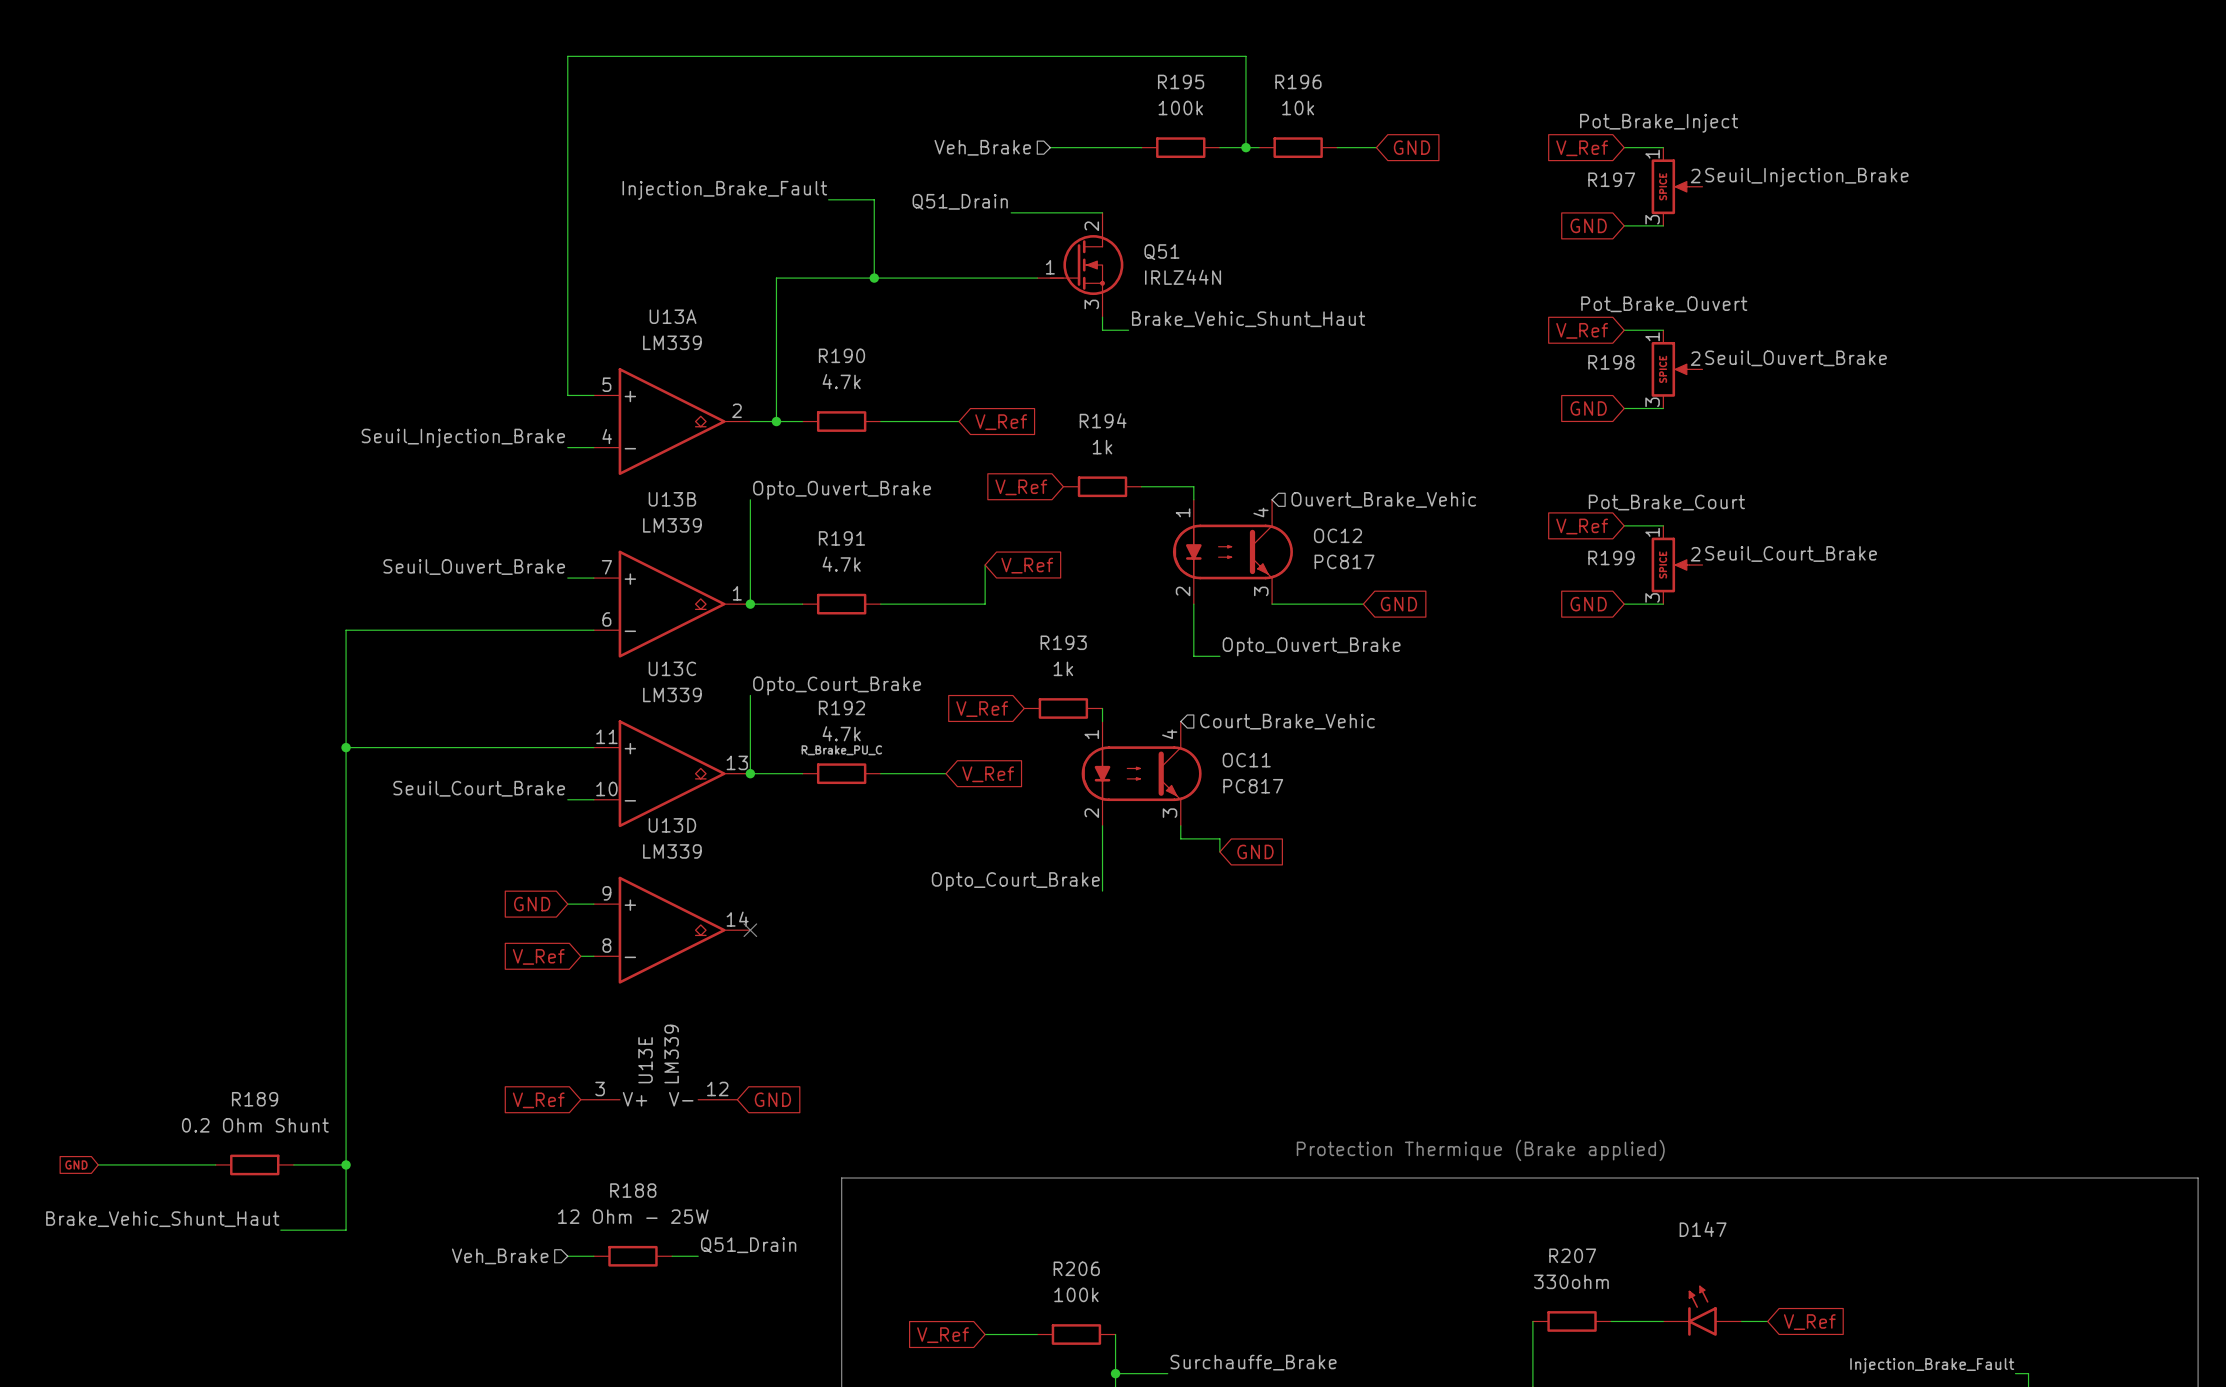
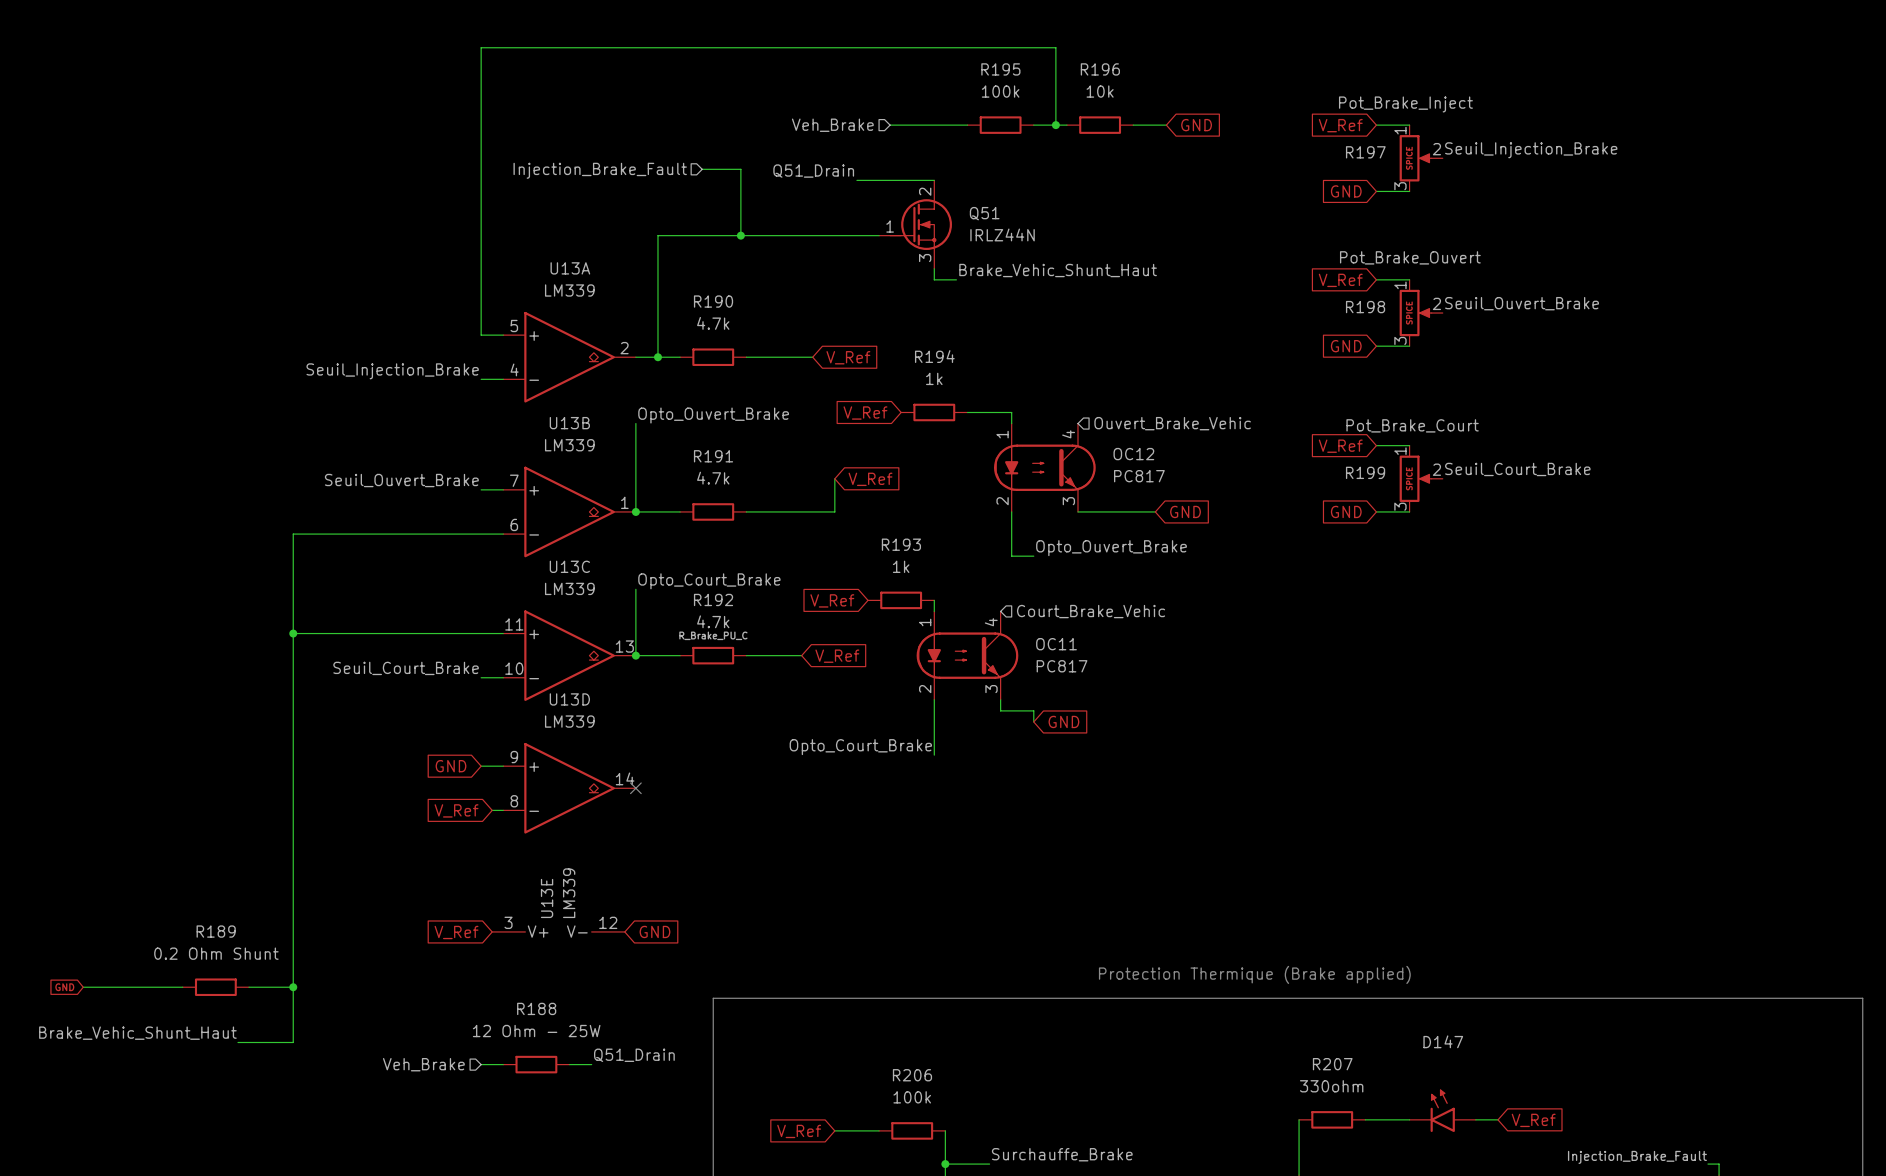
label: Injection_Brake_Fault (724, 190) -> none
hierarchical label: none -> Injection_Brake_Fault (600, 170)

